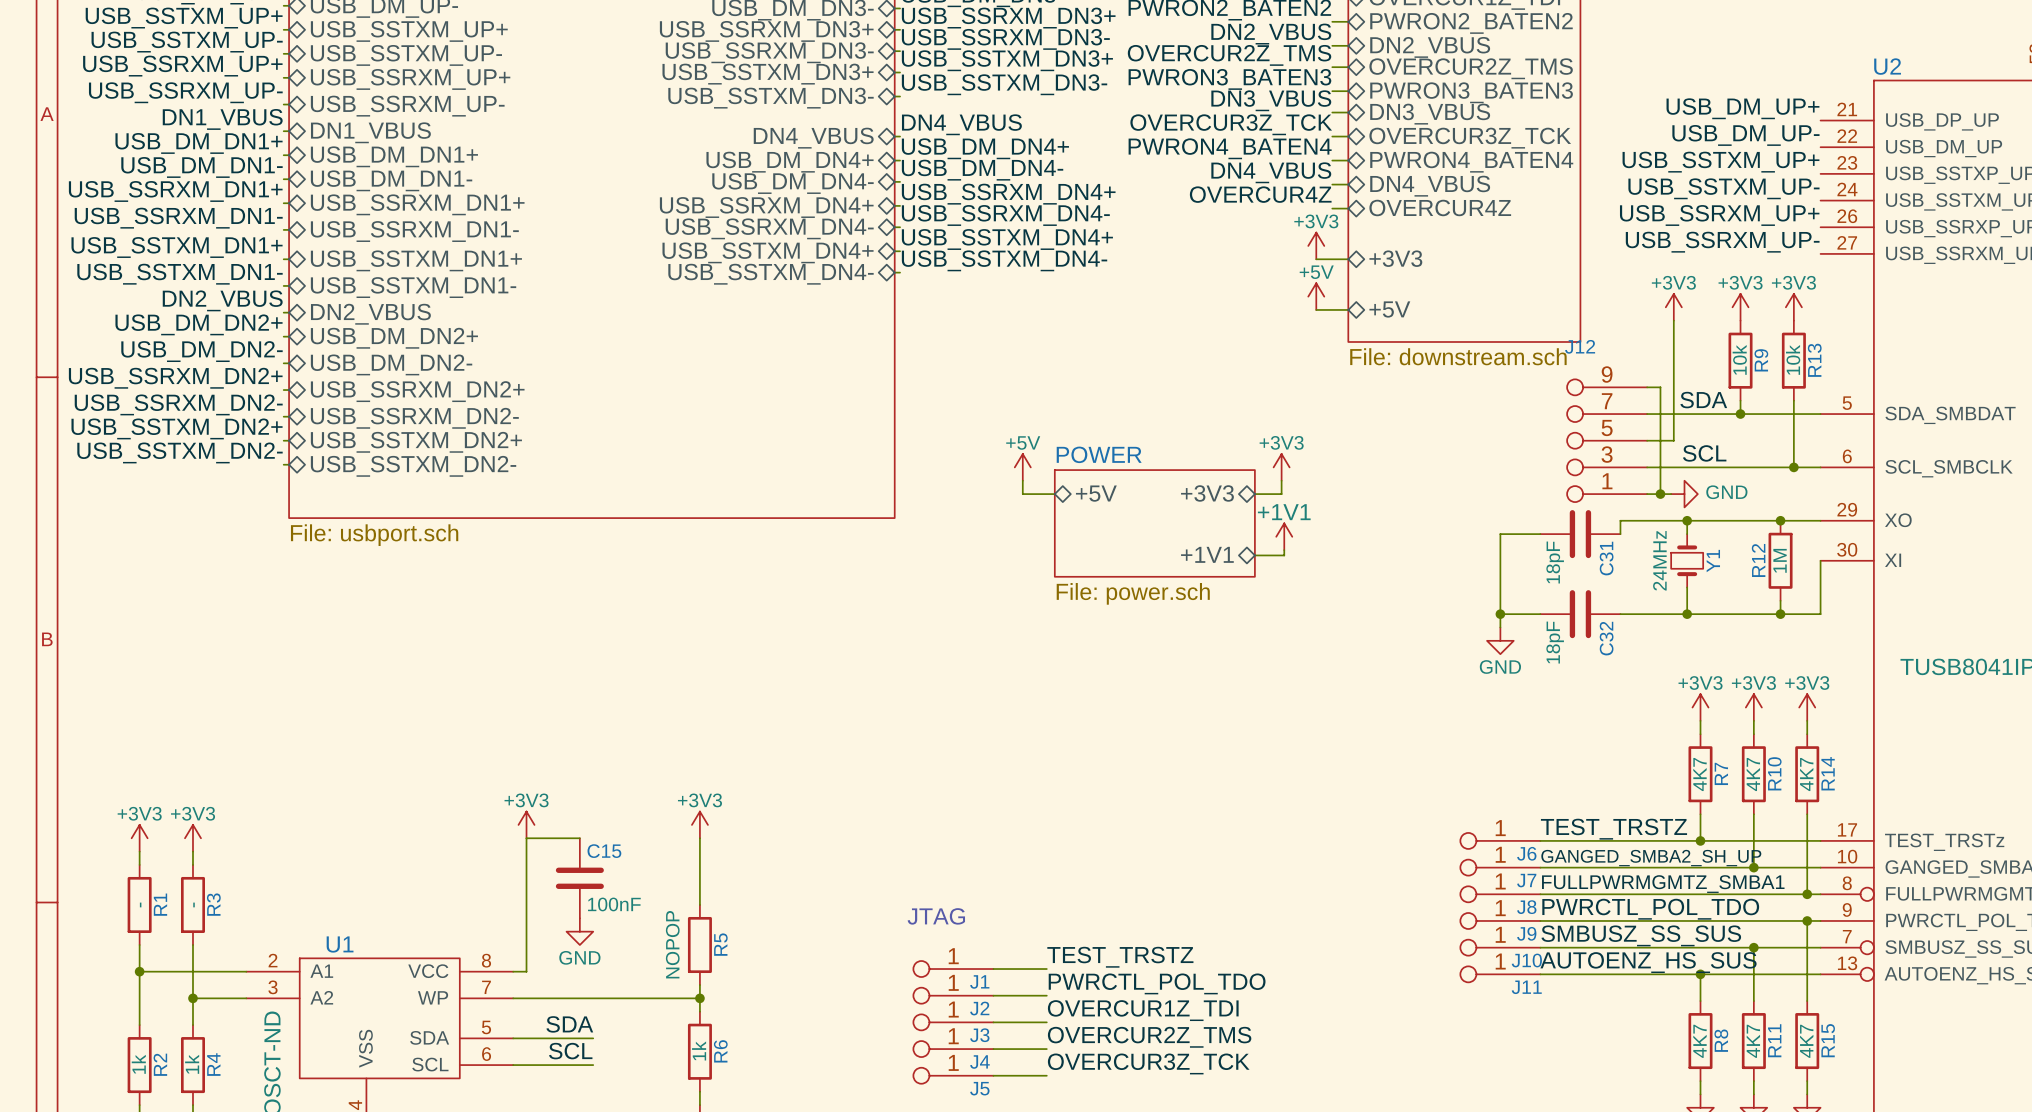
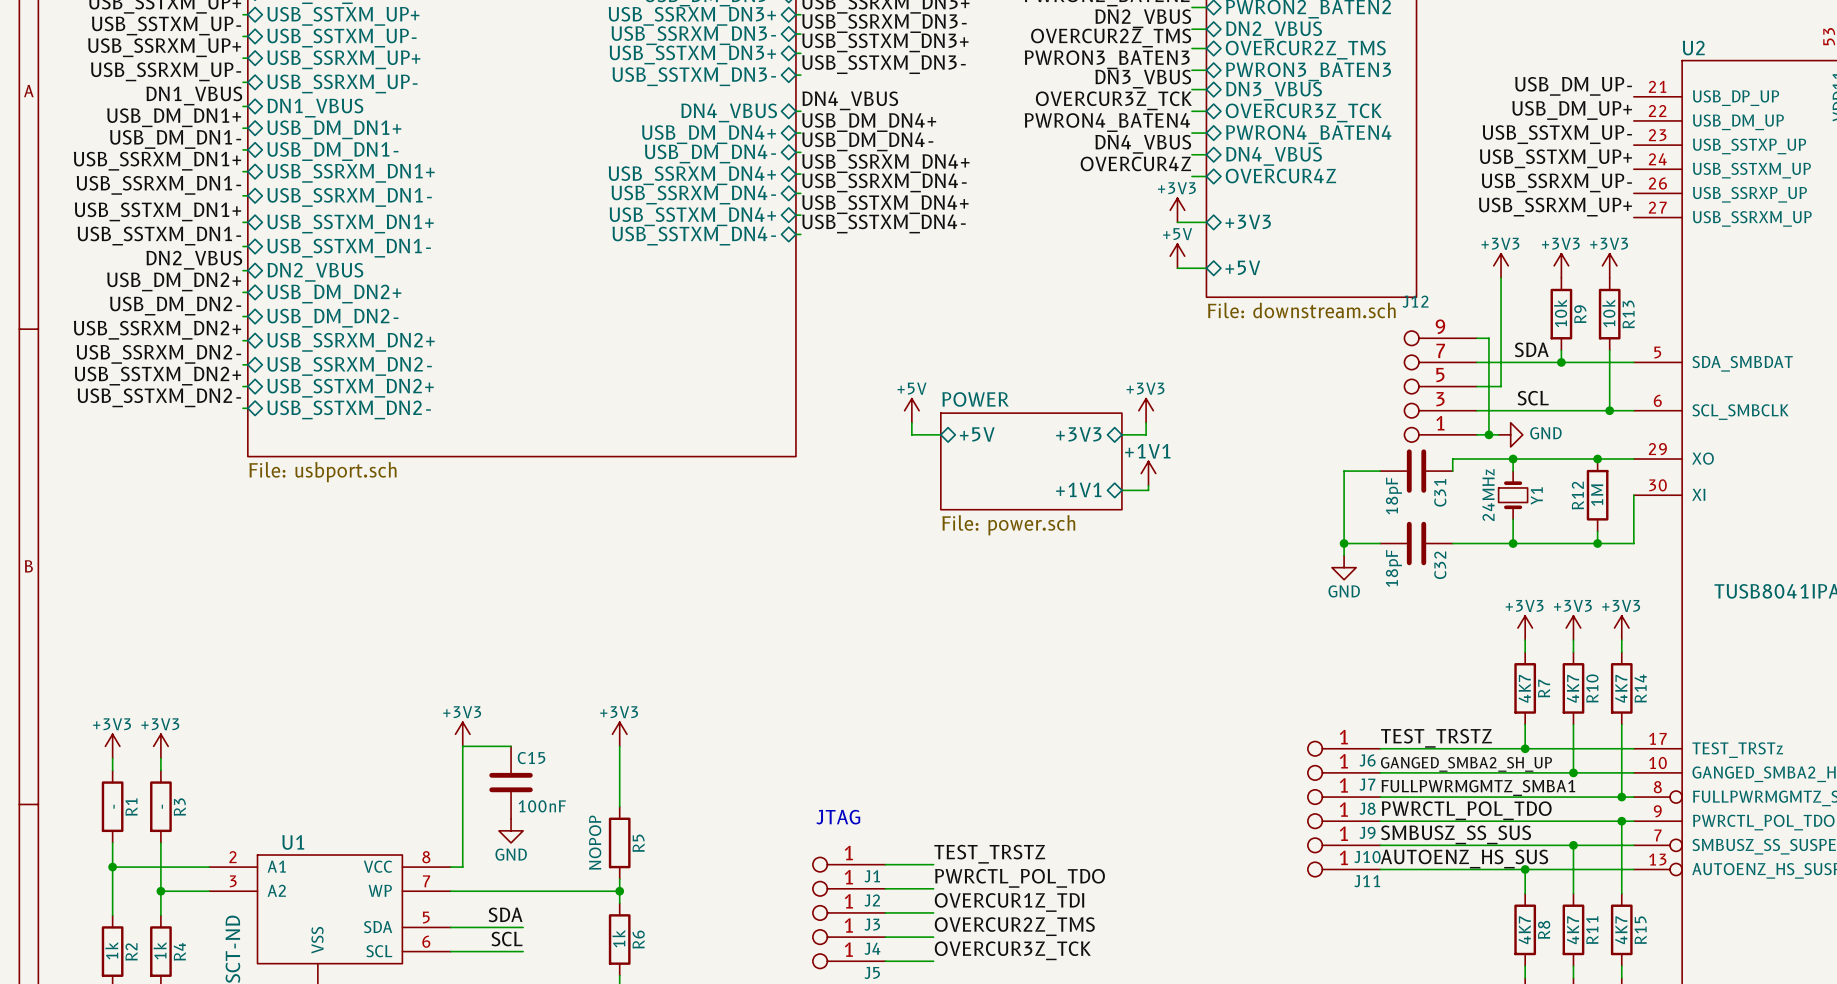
label: USB_DM_UP+ (1742, 108) -> USB_DM_UP- (1573, 86)
label: USB_DM_UP- (1745, 135) -> USB_DM_UP+ (1572, 110)
label: USB_SSTXM_UP+ (1720, 162) -> USB_SSTXM_UP- (1557, 134)
label: USB_SSTXM_UP- (1723, 188) -> USB_SSTXM_UP+ (1555, 158)
label: USB_SSRXM_UP+ (1719, 215) -> USB_SSRXM_UP- (1556, 182)
label: USB_SSRXM_UP- (1722, 242) -> USB_SSRXM_UP+ (1555, 207)

